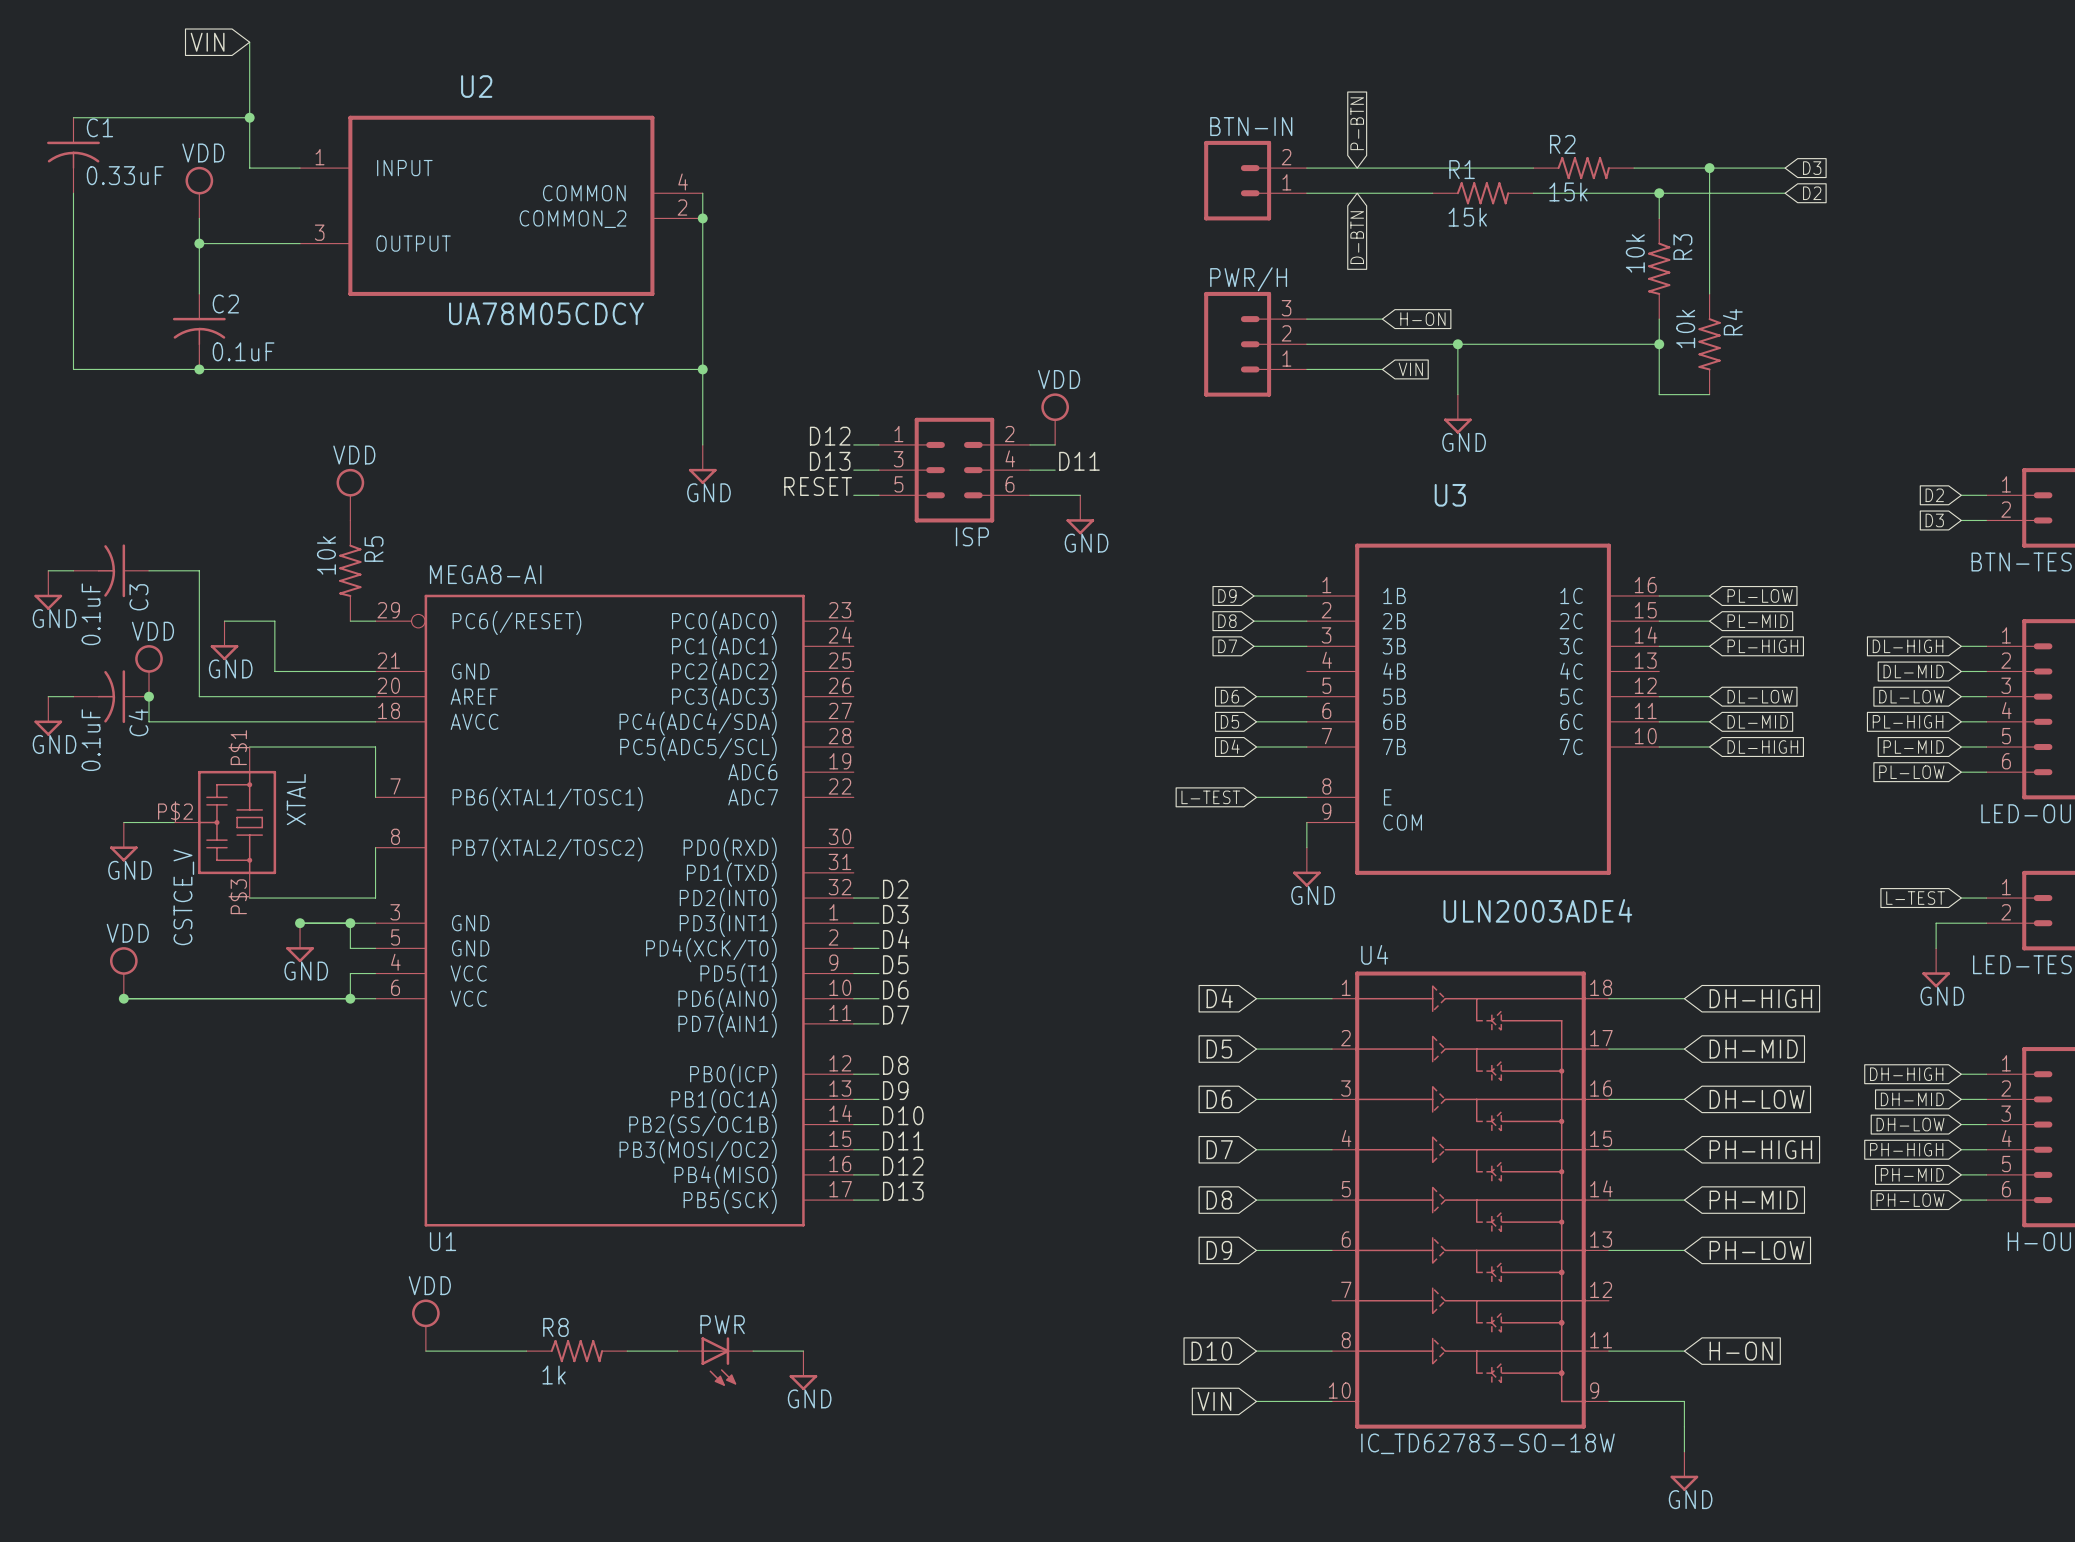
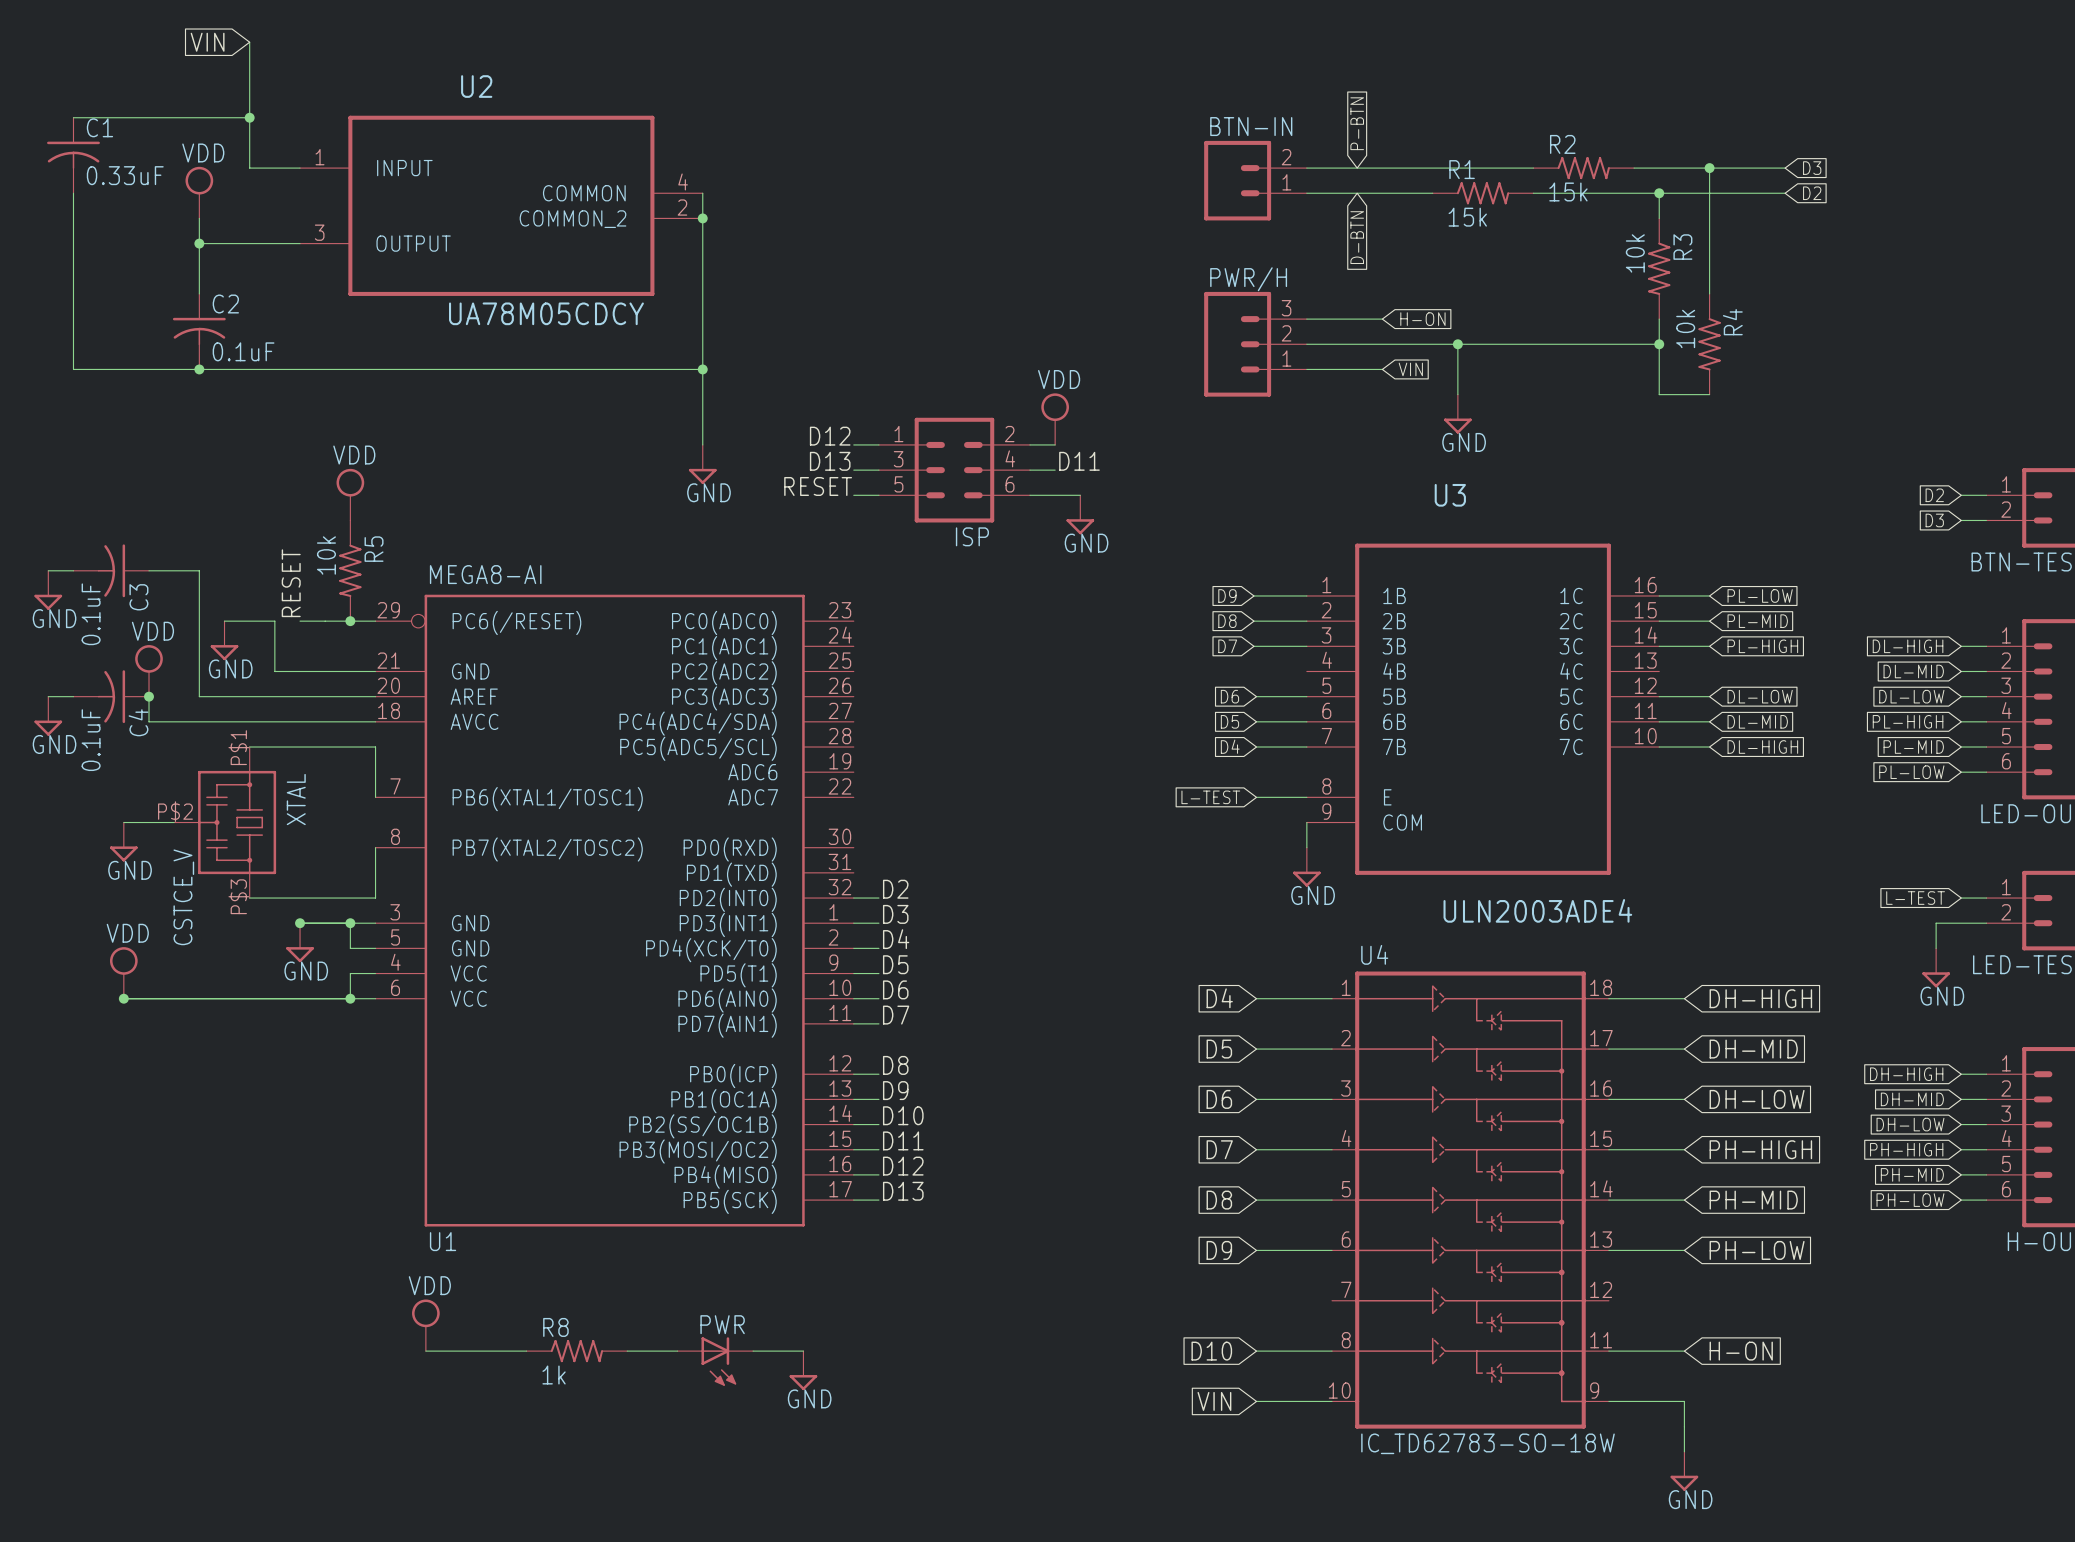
label: none -> RESET (291, 583)
wire: none -> (300, 621) (350, 621)
junction: none -> (350, 621)

